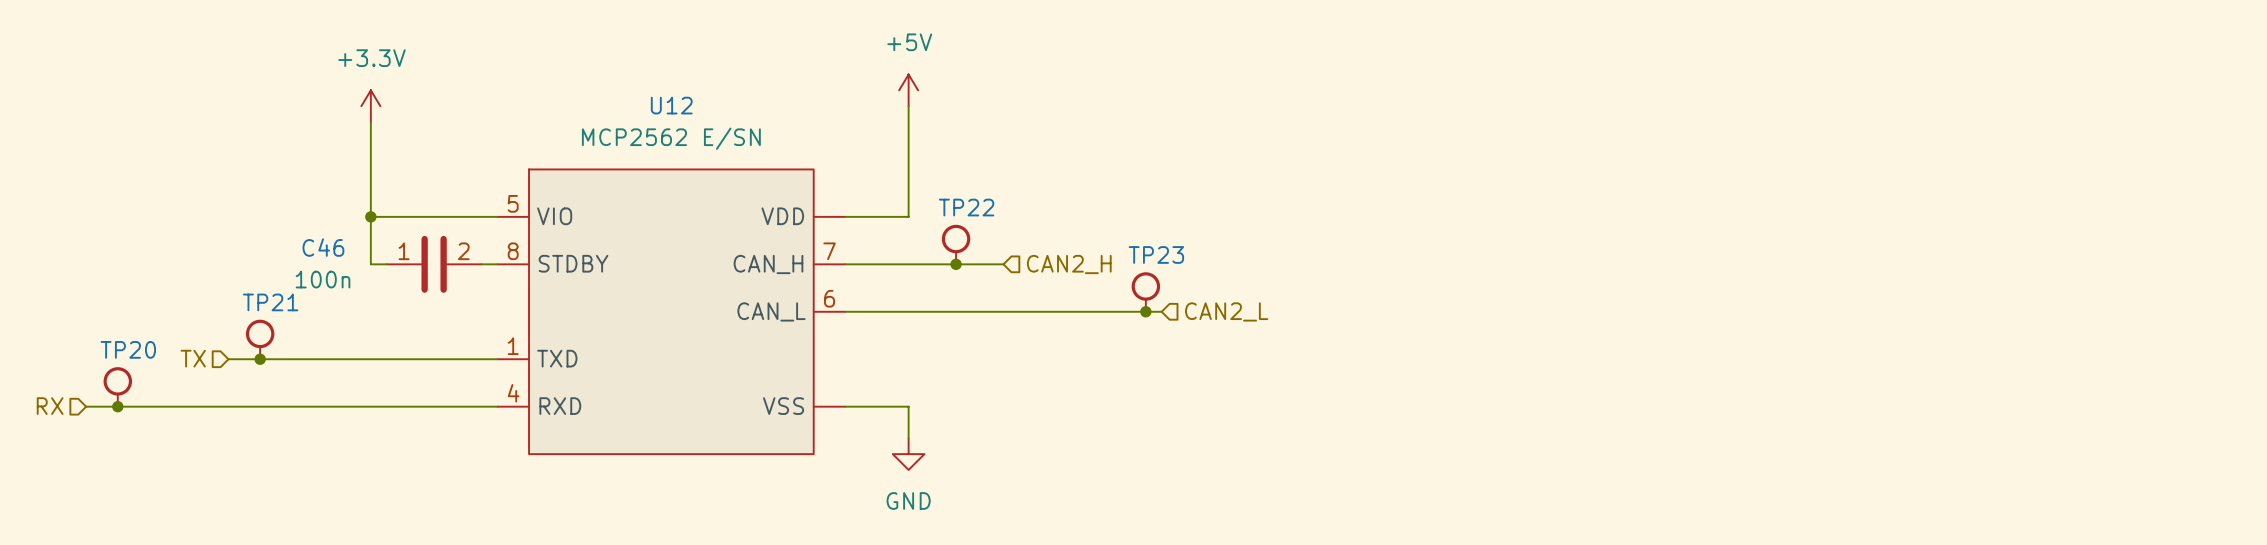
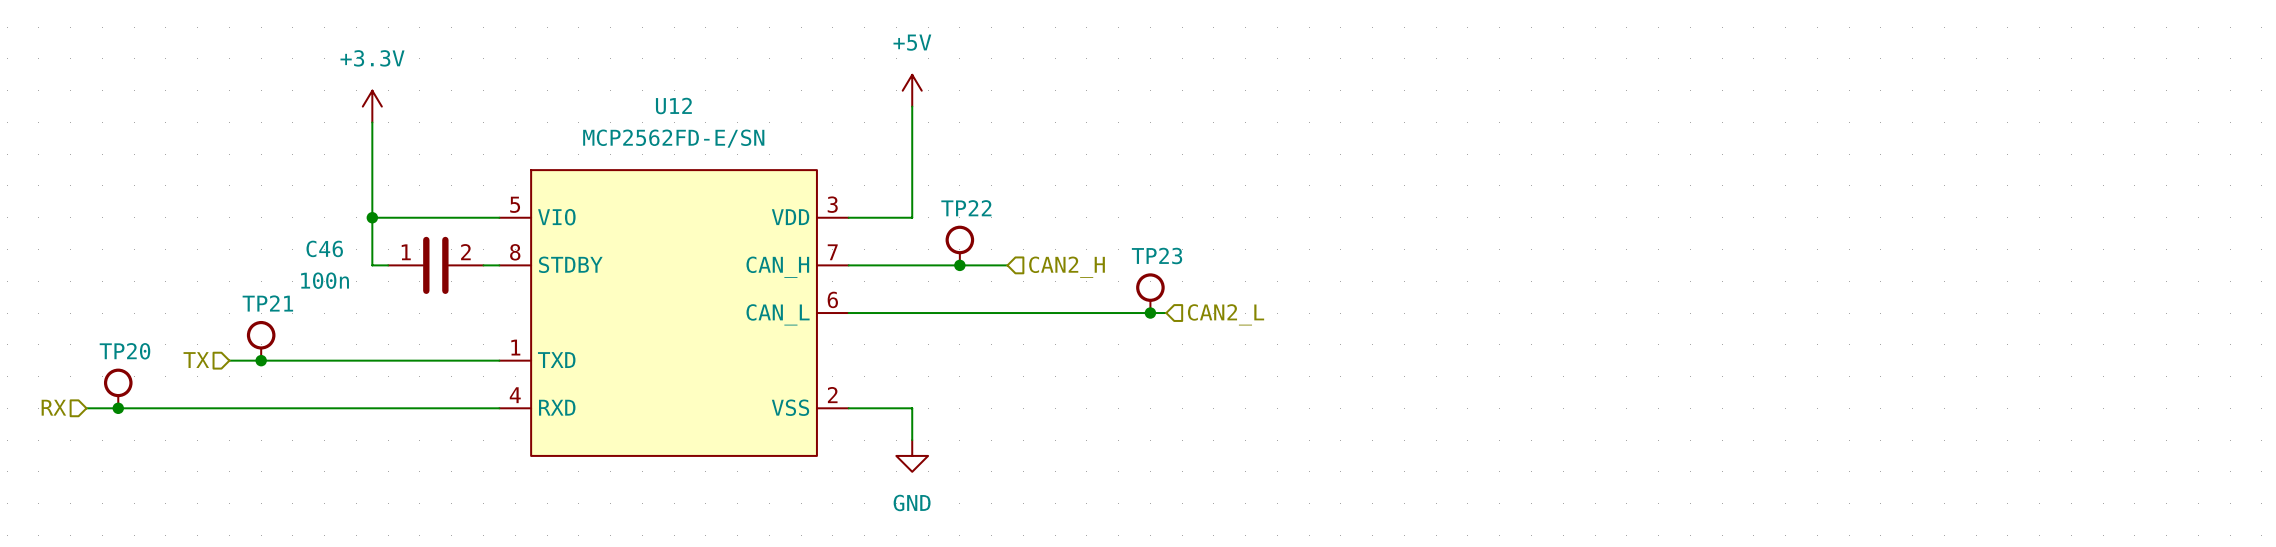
U12 value: MCP2562 E/SN (671, 138) -> MCP2562FD-E/SN (673, 138)
U12 pin number: none -> 3 (832, 204)
U12 pin number: none -> 2 (832, 395)

